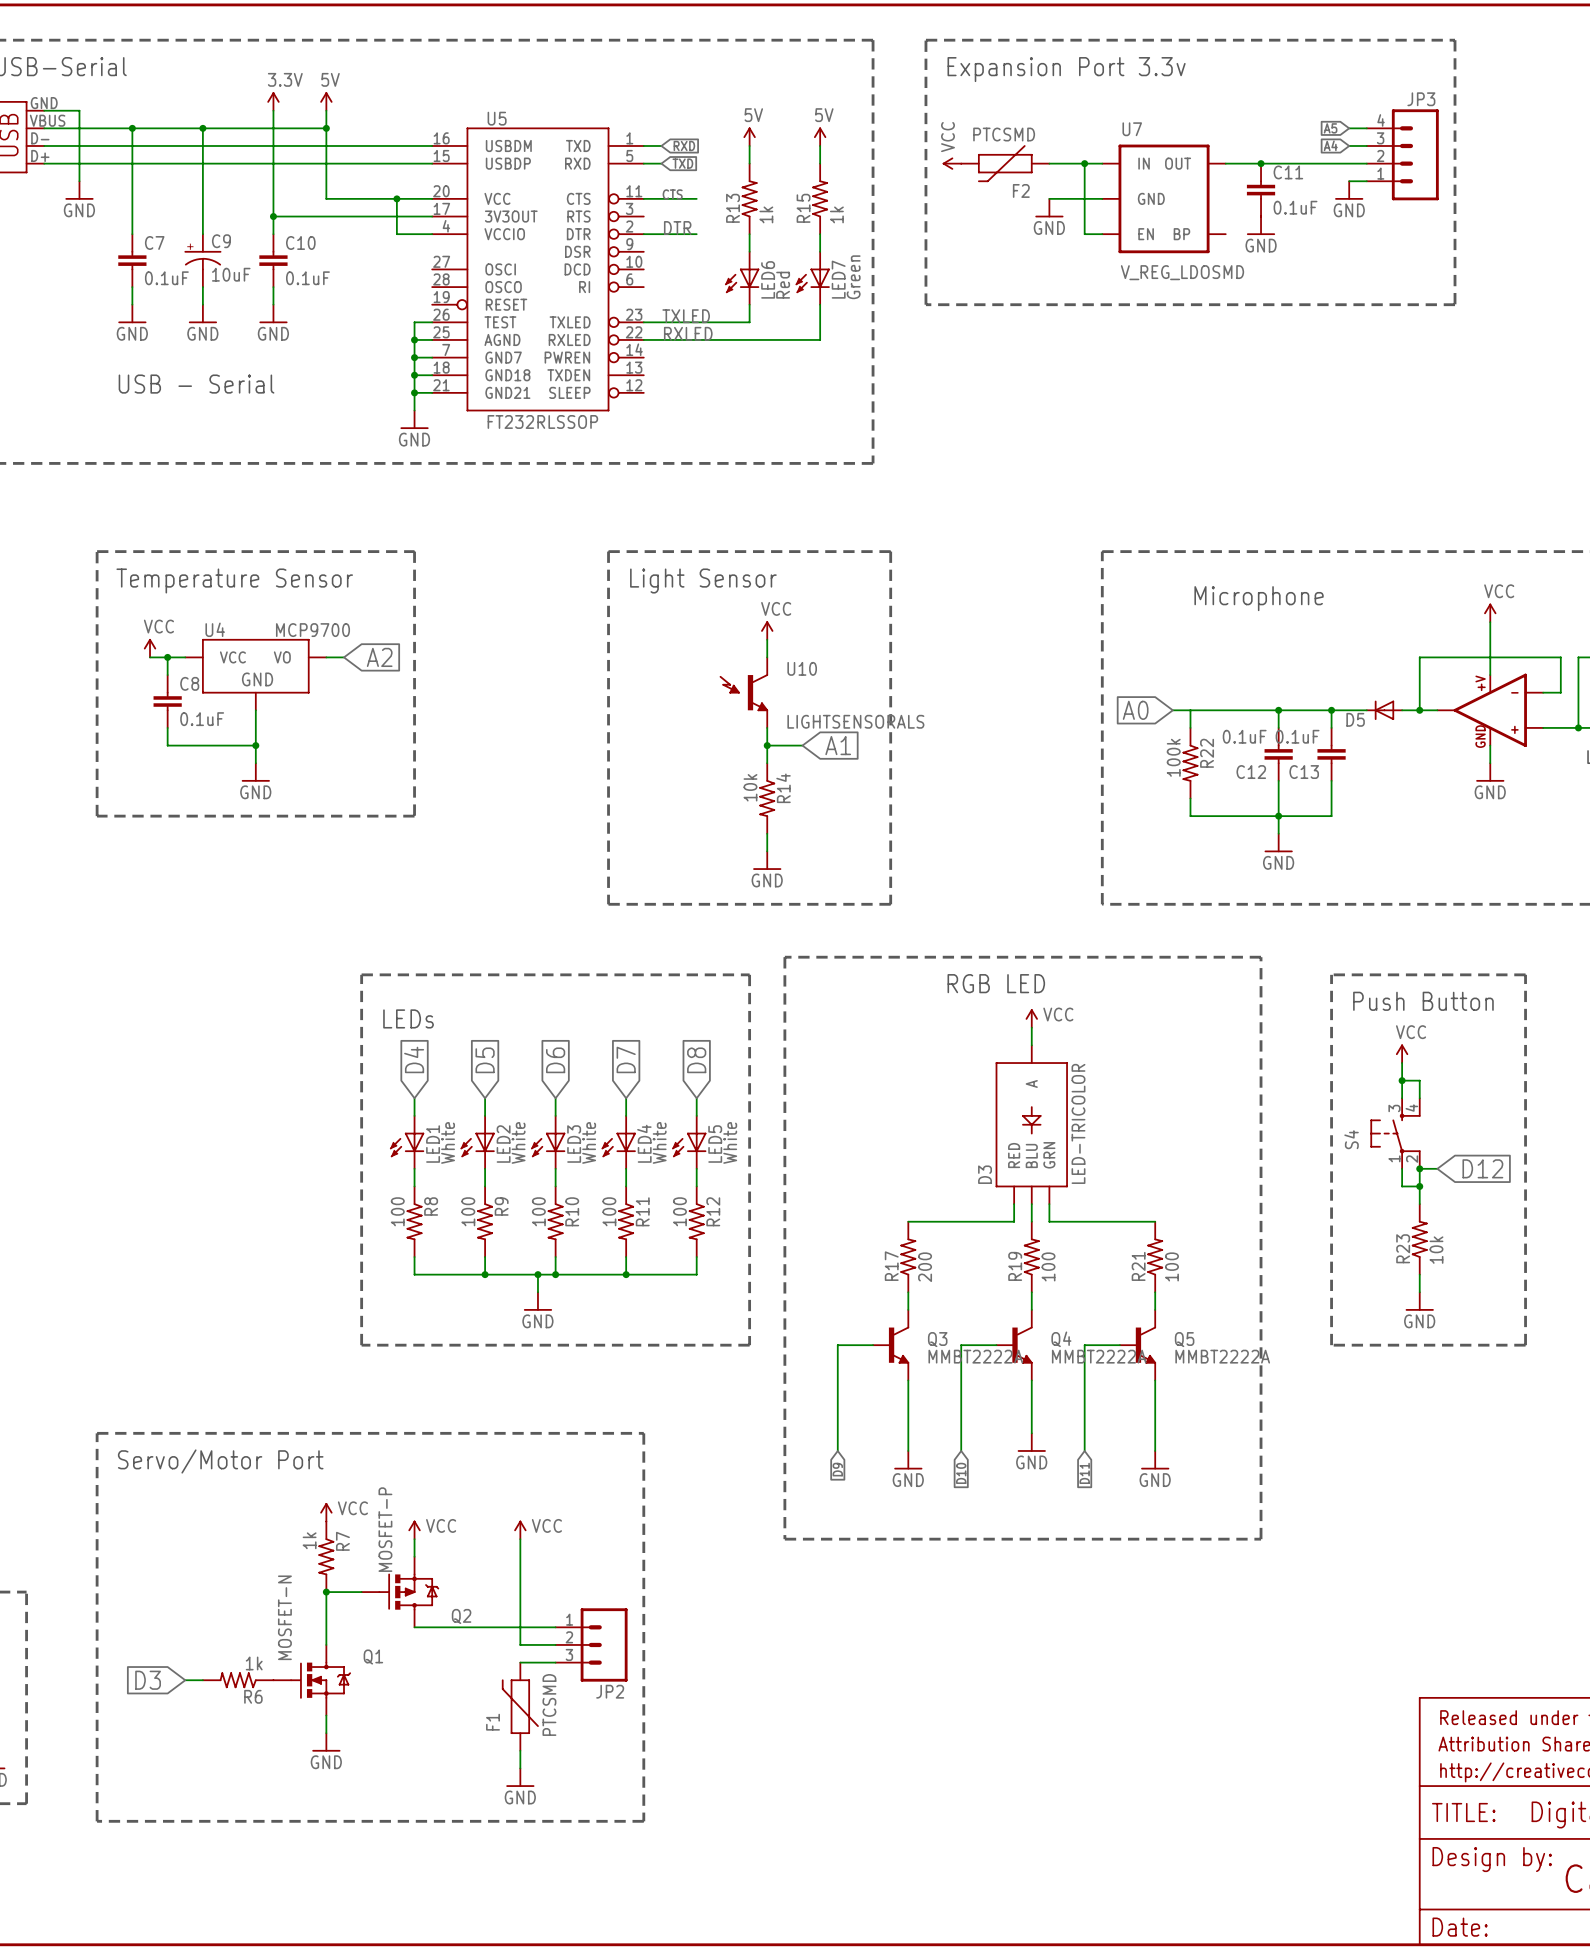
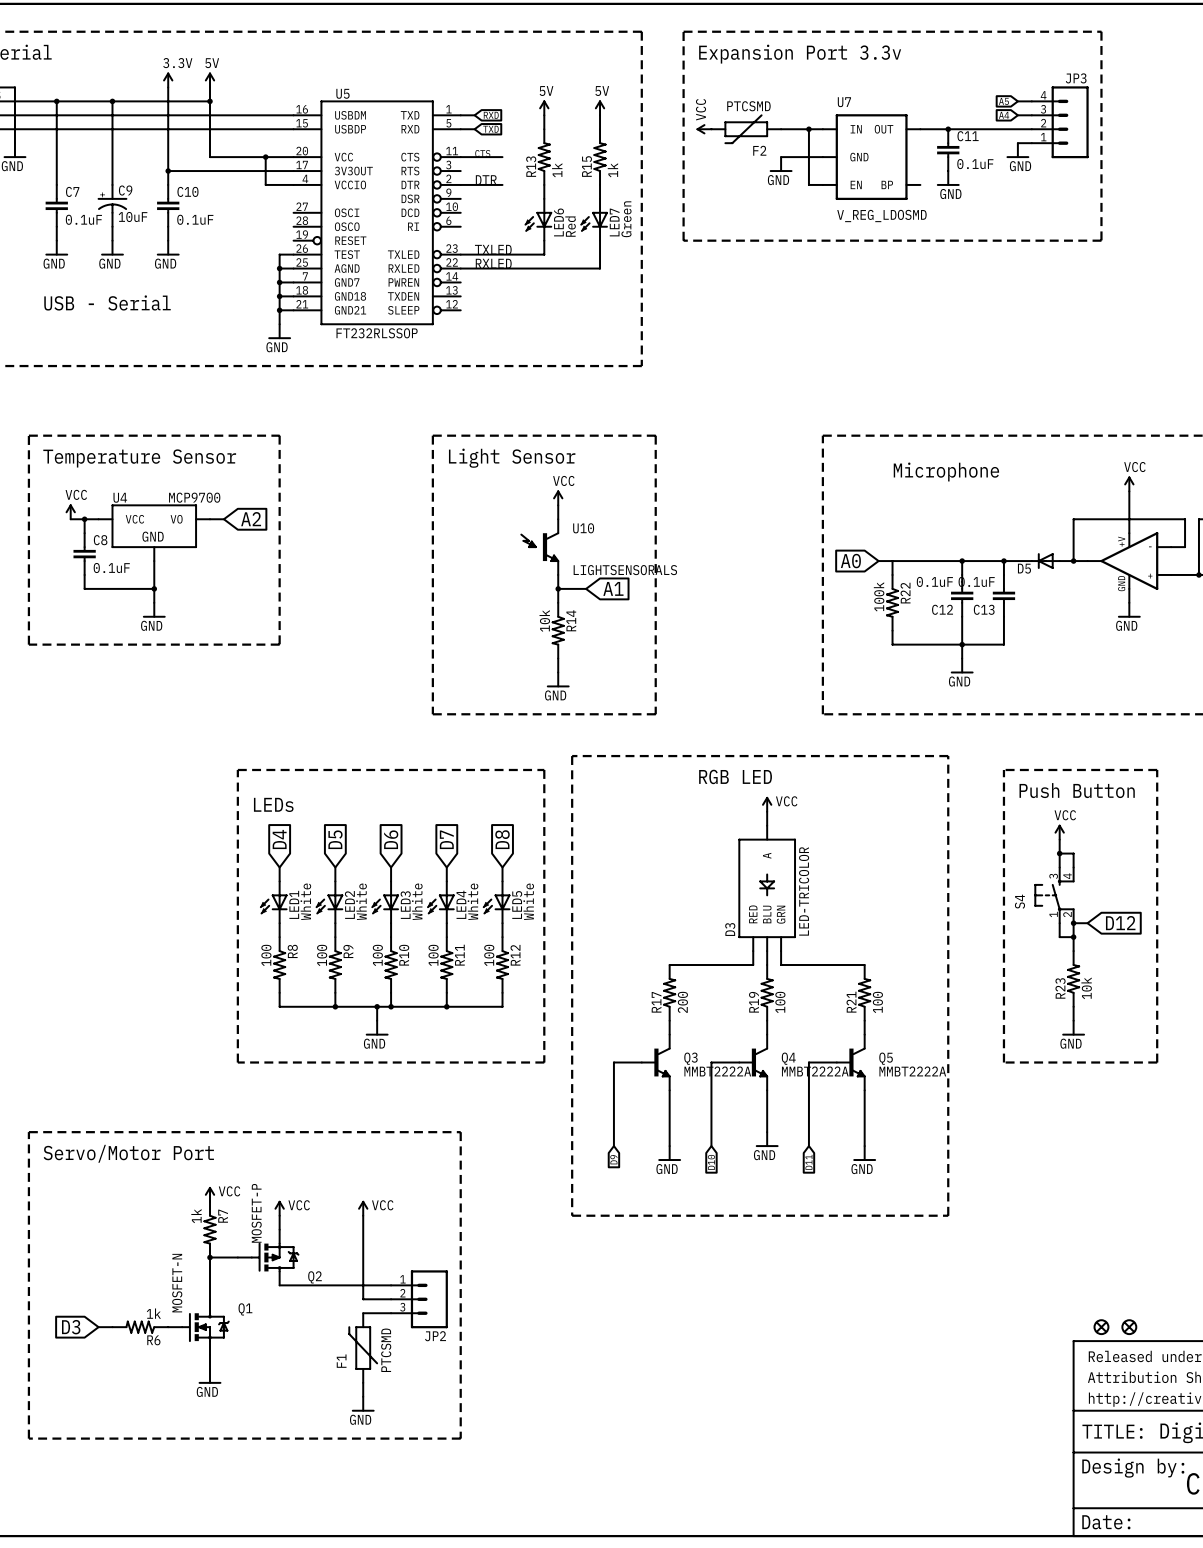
part: none -> (1101, 1327)
part: none -> (1129, 1327)

